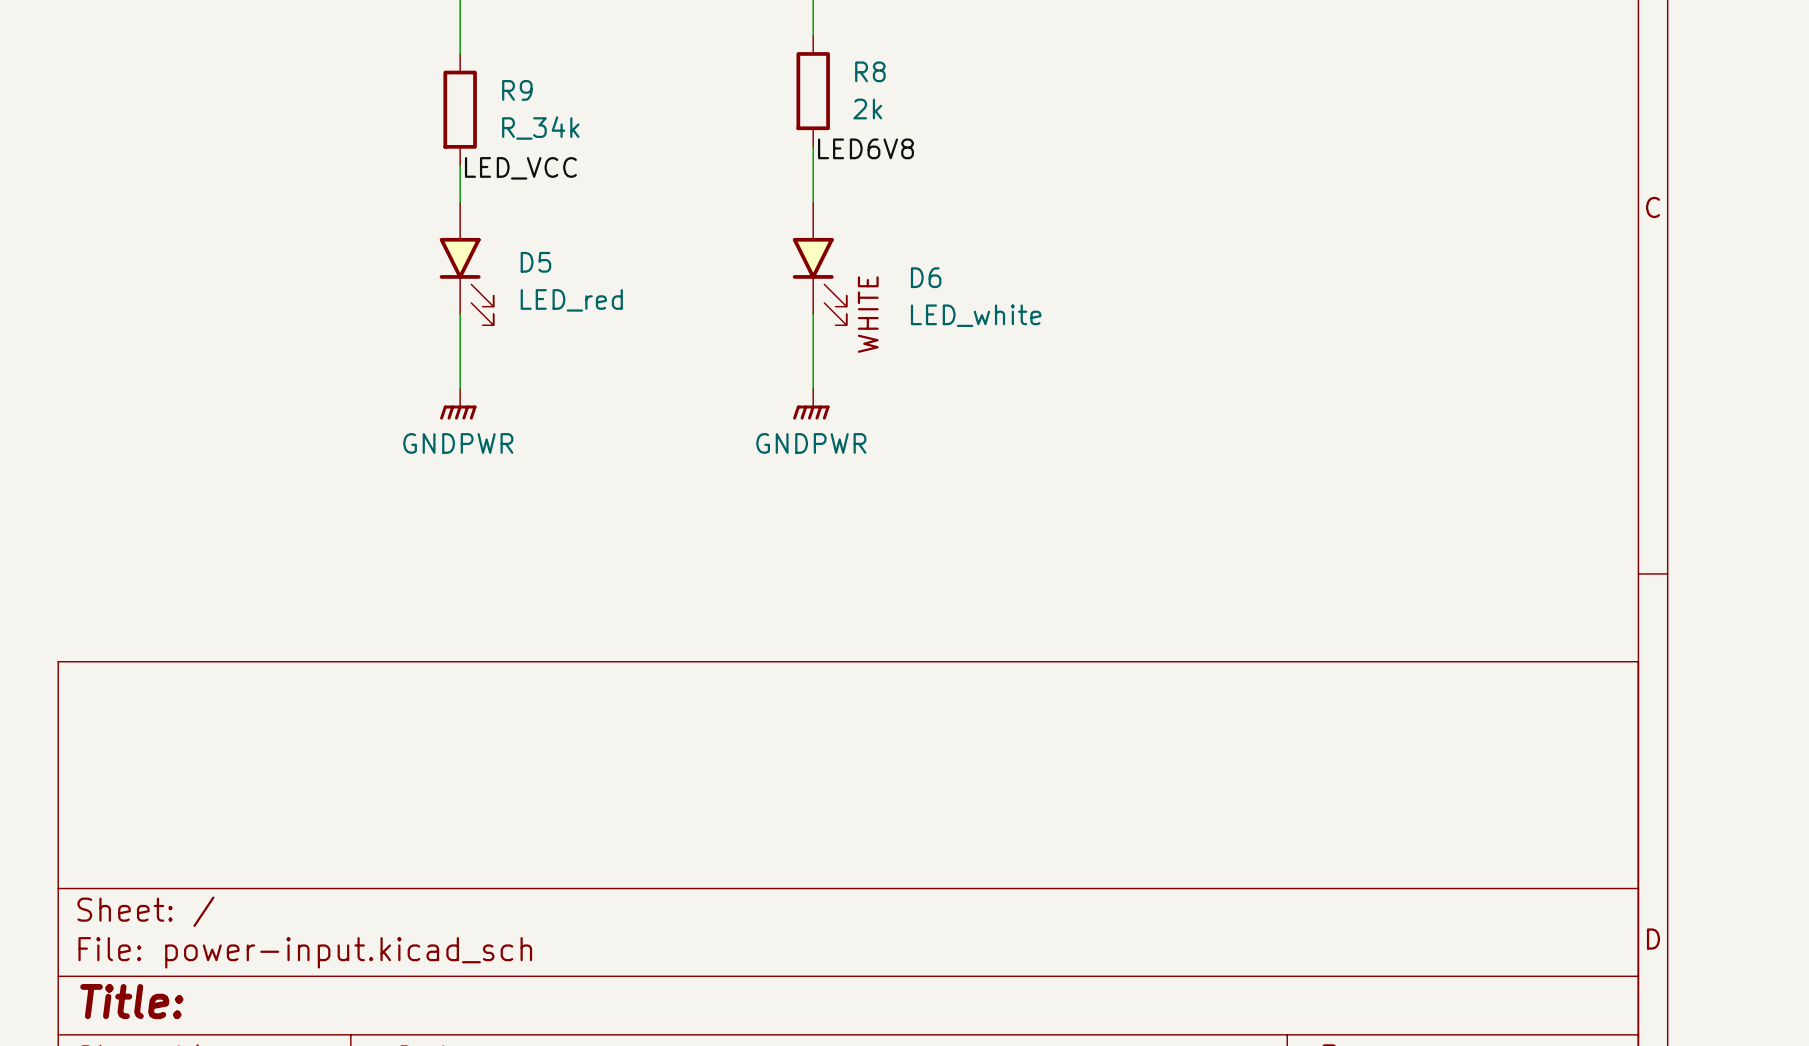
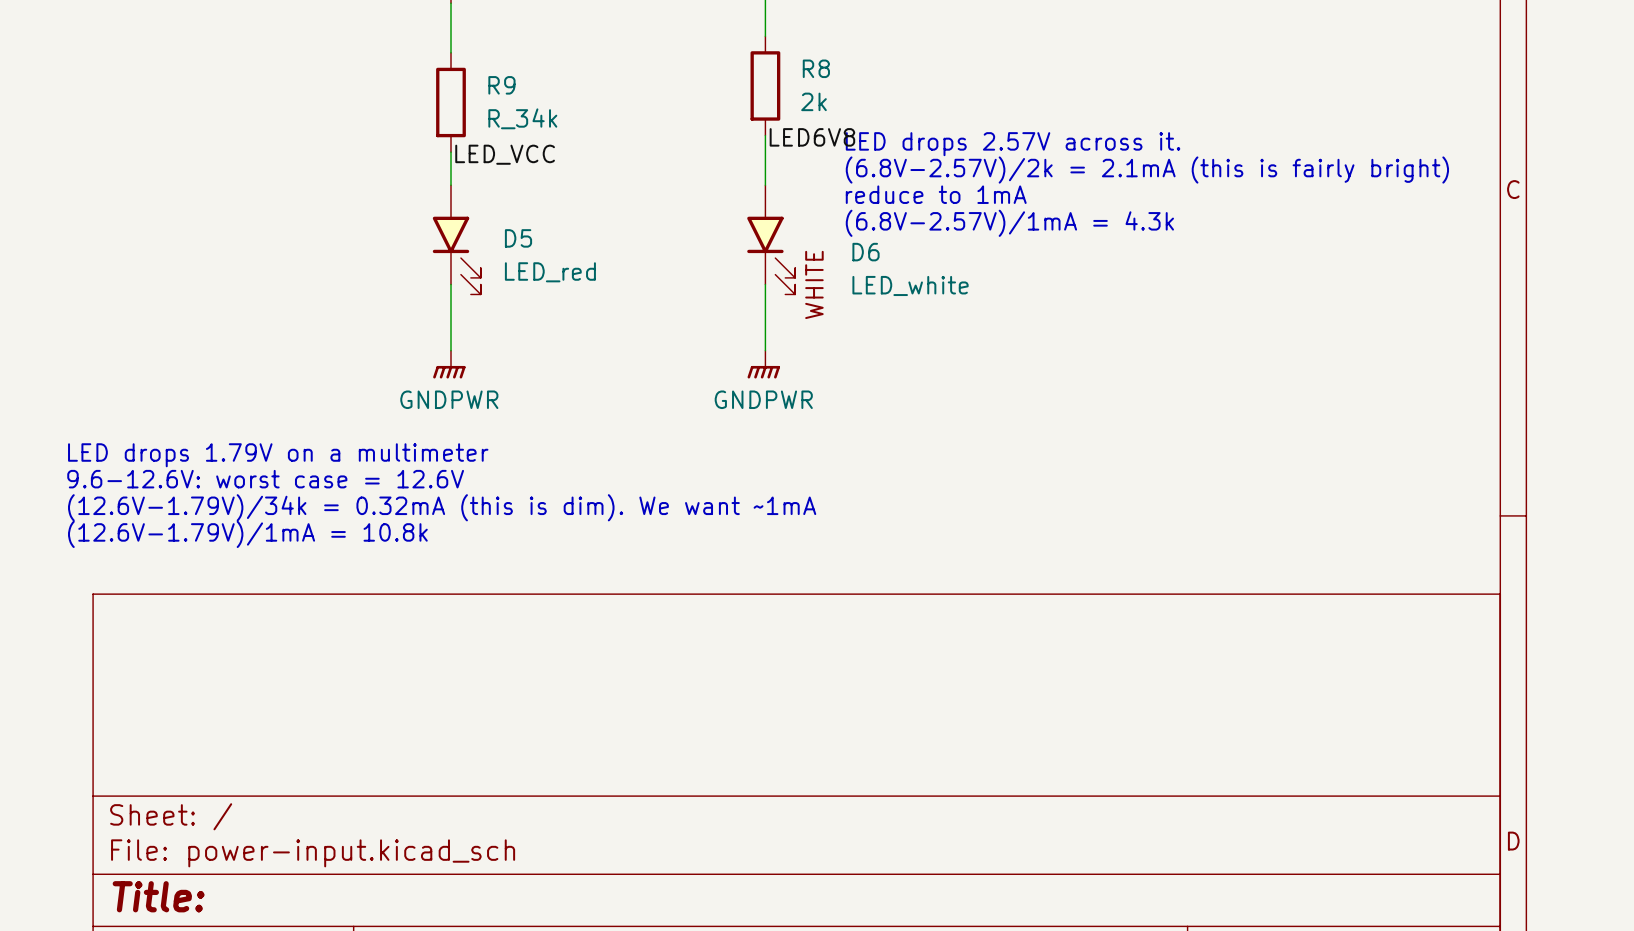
text: none -> LED drops 2.57V across it. (1013, 144)
text: none -> (6.8V-2.57V)/2k = 2.1mA (this is fairly bright) (1147, 170)
text: none -> reduce to 1mA (936, 194)
text: none -> (6.8V-2.57V)/1mA = 4.3k (1009, 223)
text: none -> LED drops 1.79V on a multimeter (278, 455)
text: none -> 9.6-12.6V: worst case = 12.6V (265, 479)
text: none -> (12.6V-1.79V)/34k = 0.32mA (this is dim). We want ~1mA (442, 507)
text: none -> (12.6V-1.79V)/1mA = 10.8k (247, 534)

